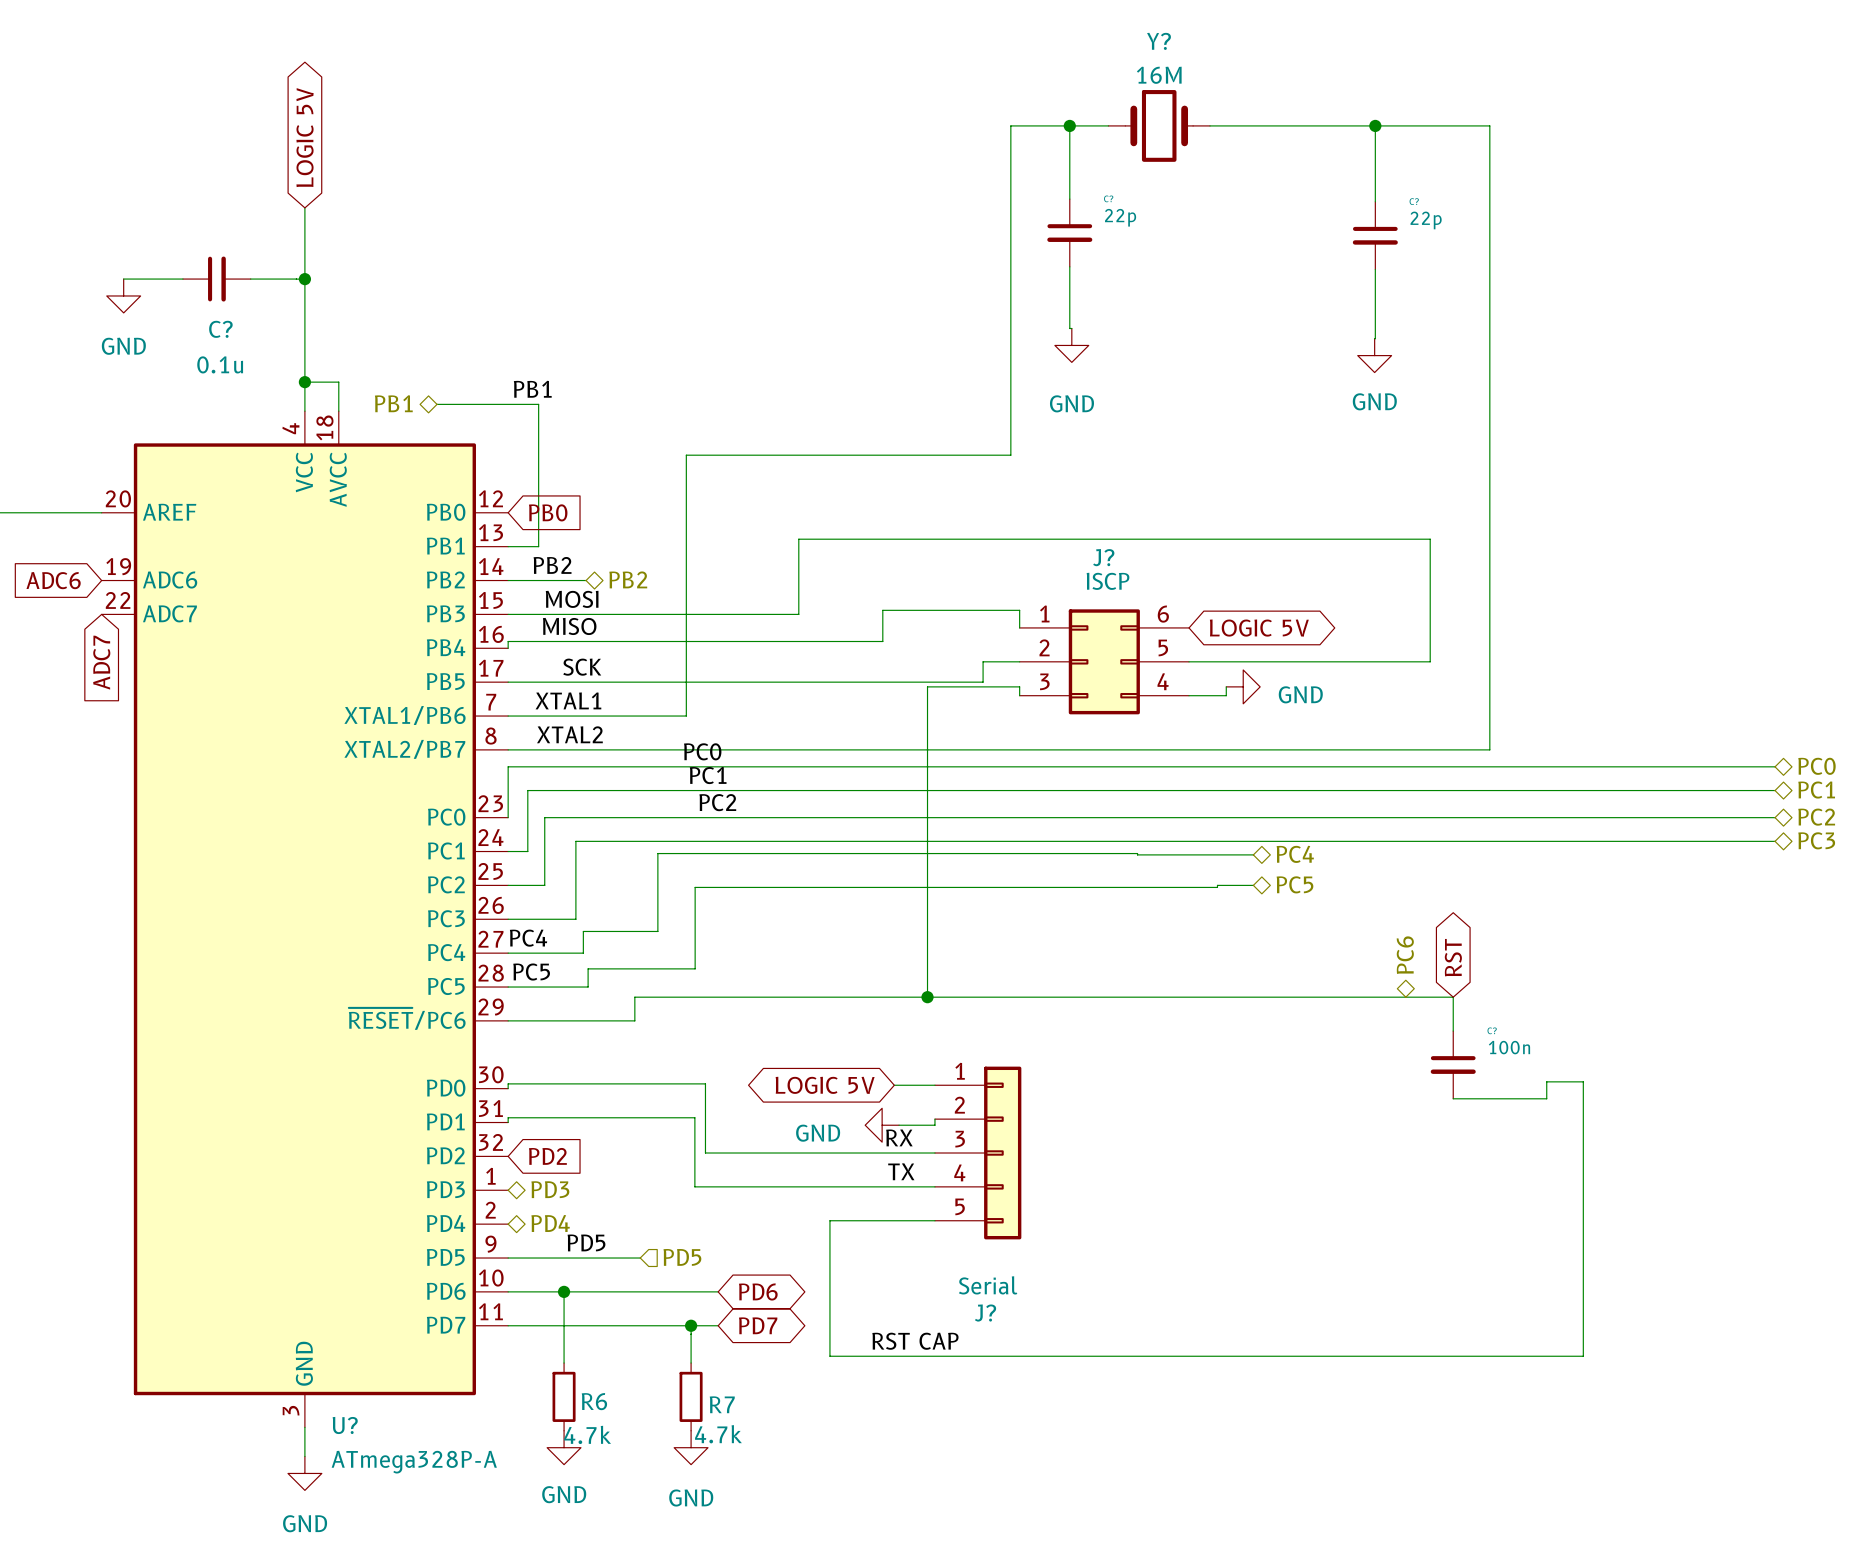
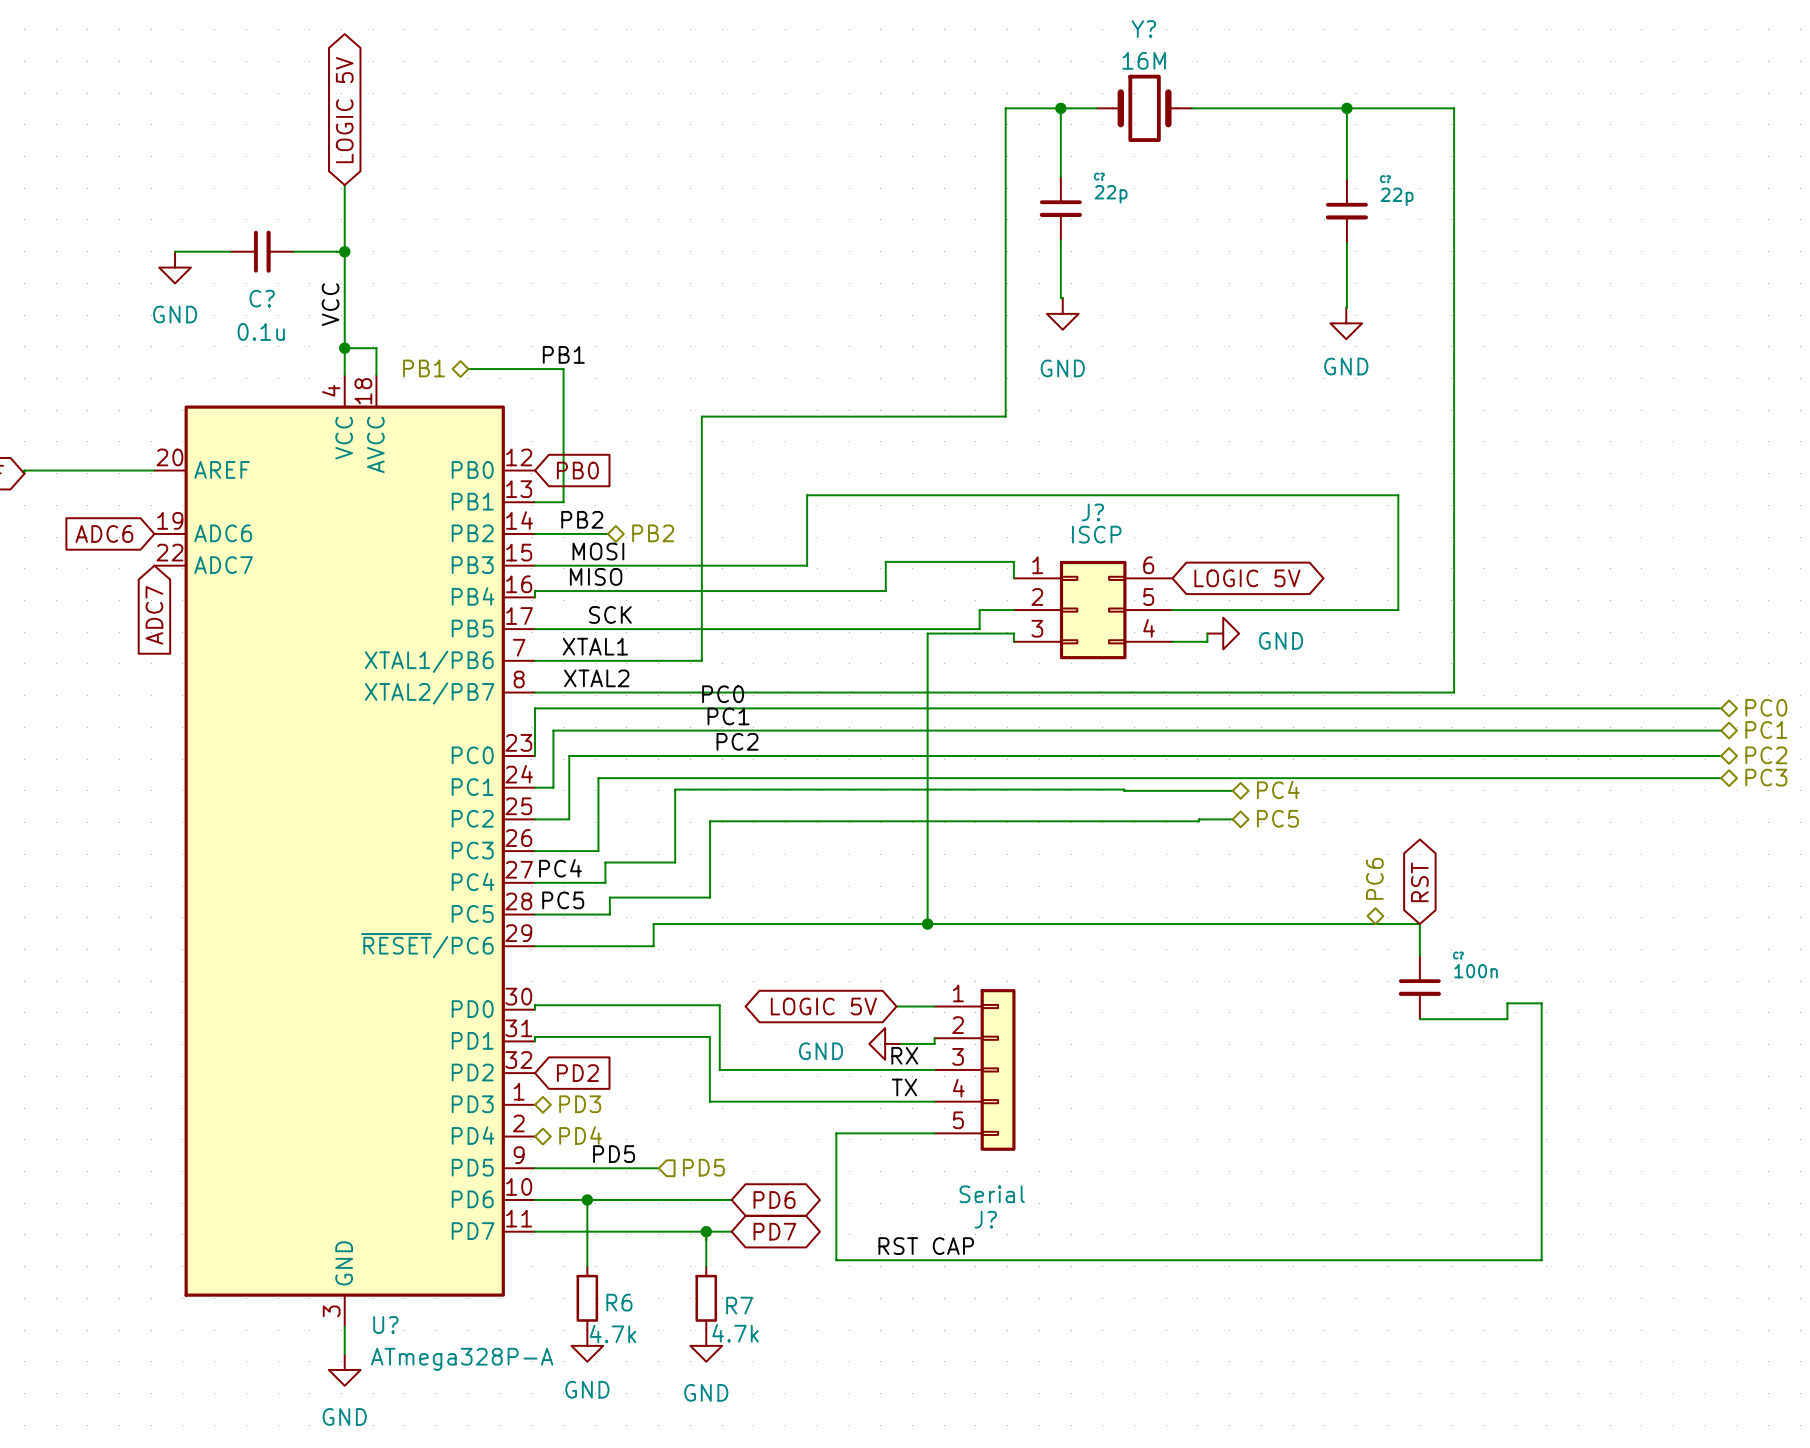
label: none -> VCC (330, 304)

